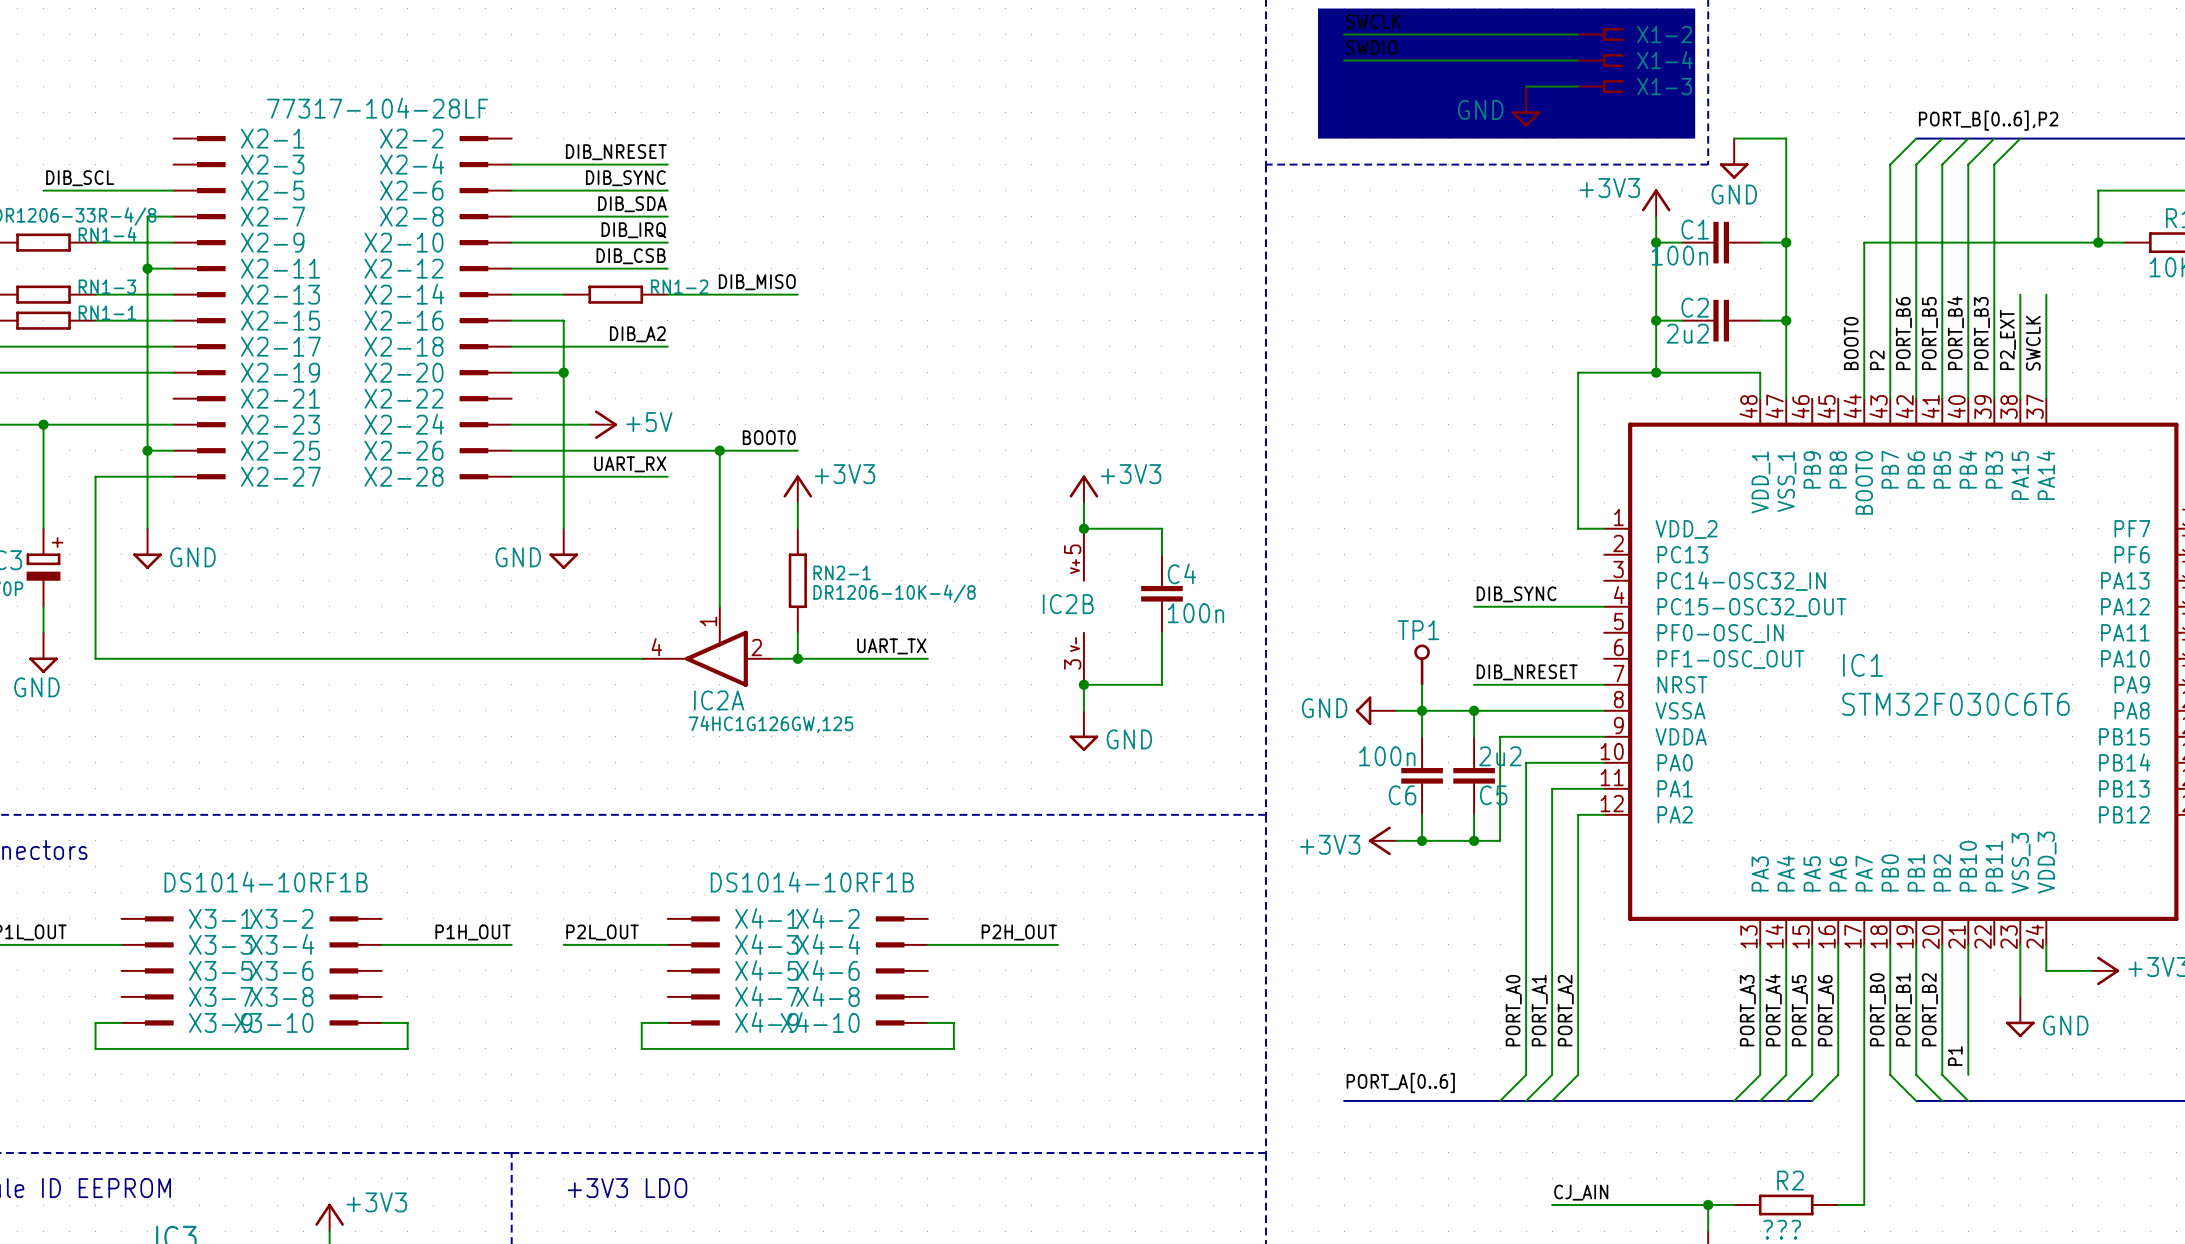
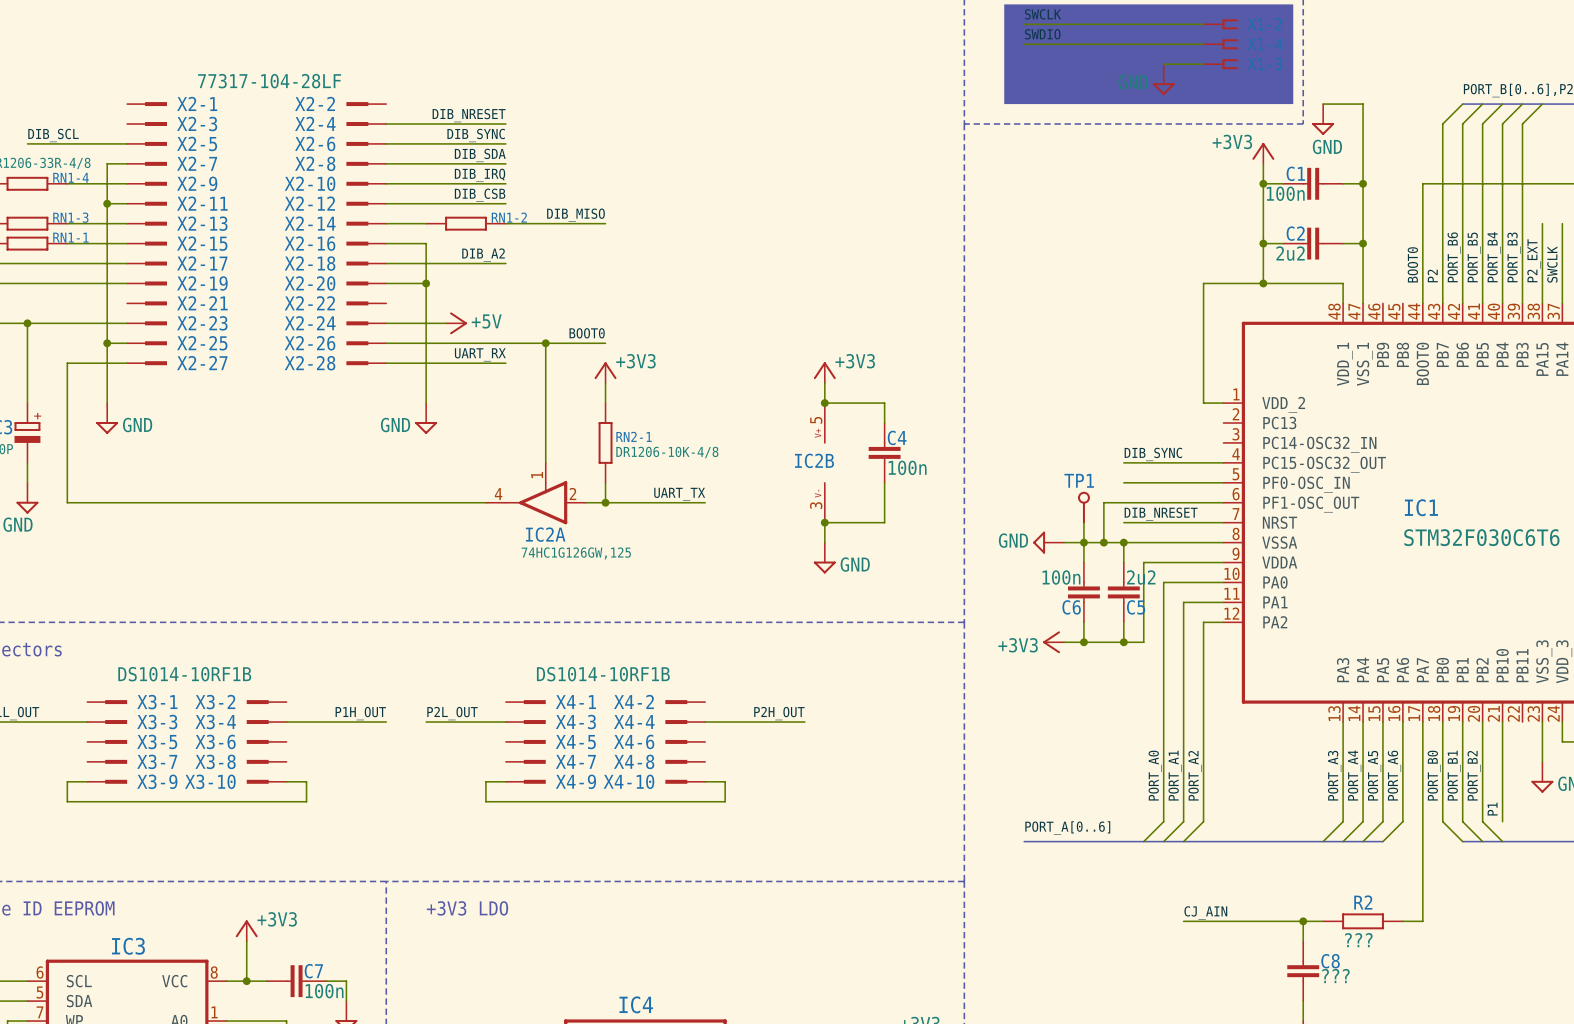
wire: none -> (1123, 482) (1223, 482)
wire: none -> (1223, 502) (1103, 502) (1103, 542)
junction: none -> (1103, 542)

